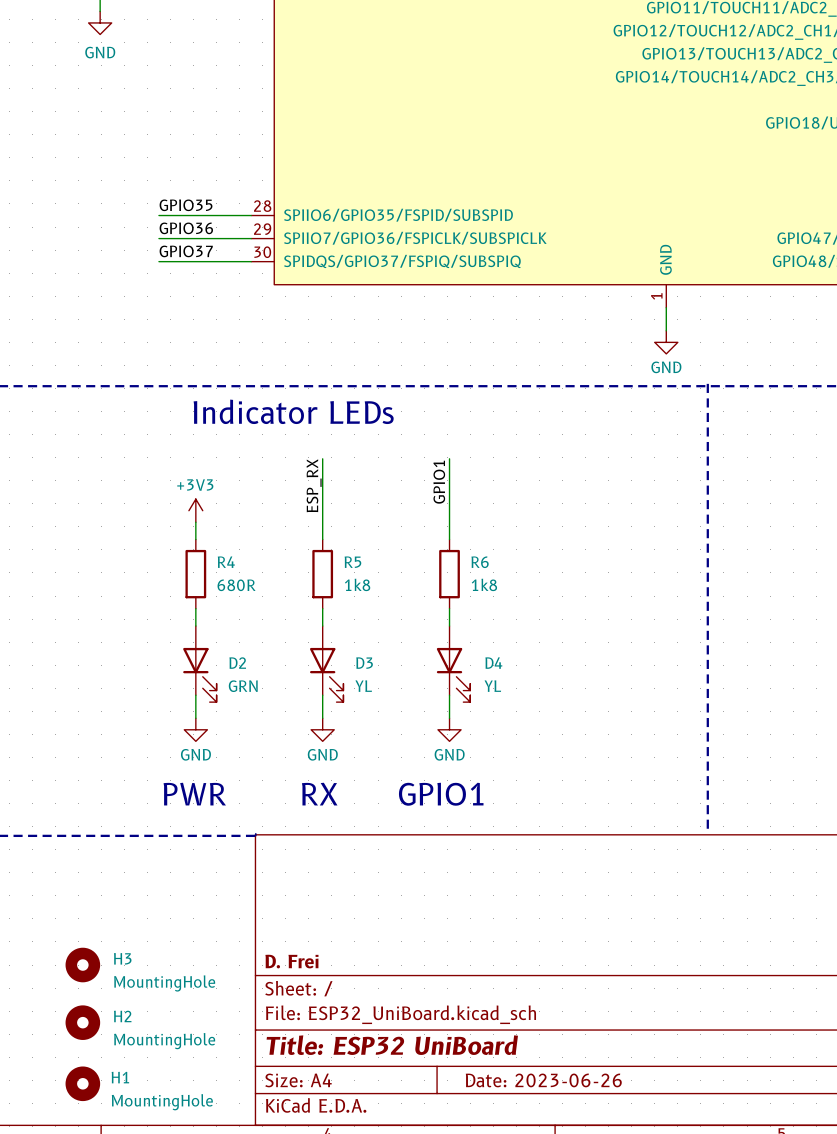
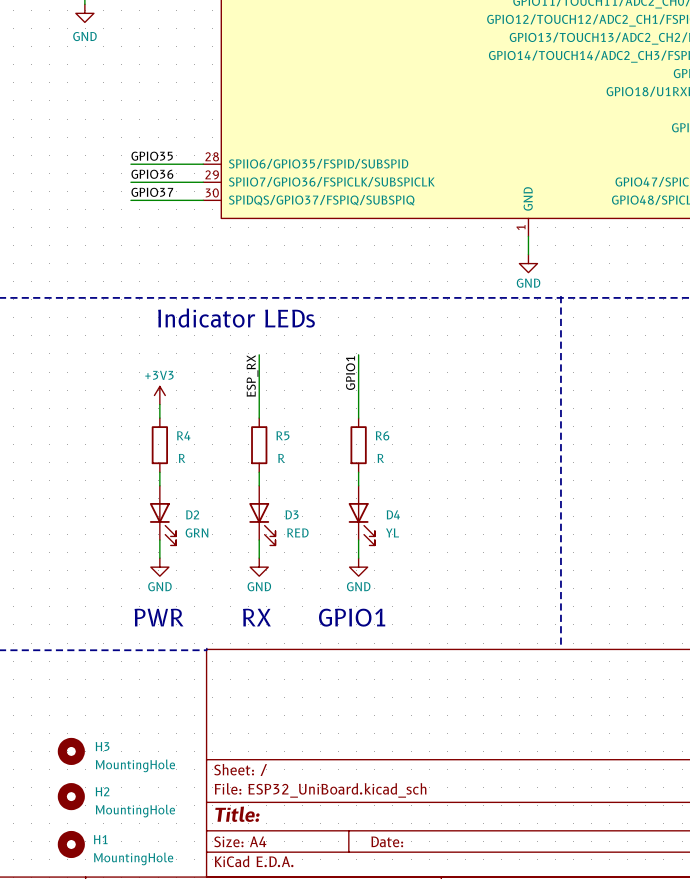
R5 value: 1k8 (357, 584) -> R (281, 458)
R6 value: 1k8 (484, 584) -> R (380, 458)
R4 value: 680R (236, 585) -> R (182, 458)
D3 value: YL (363, 686) -> RED (297, 532)
title block: D. Frei (291, 961) -> none
title block: Title: ESP32 UniBoard (392, 1045) -> Title: (237, 814)
title block: Date: 2023-06-26 (543, 1080) -> Date: (387, 841)

